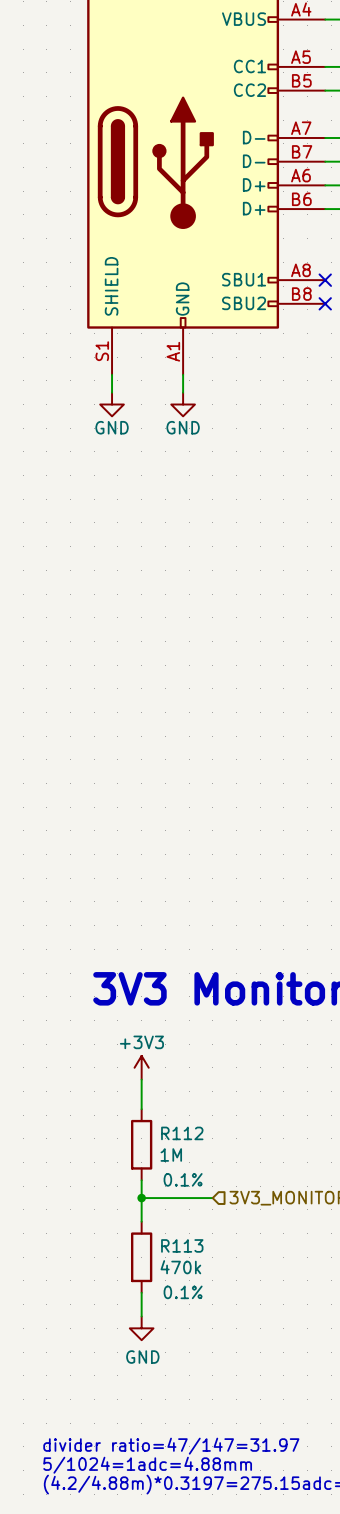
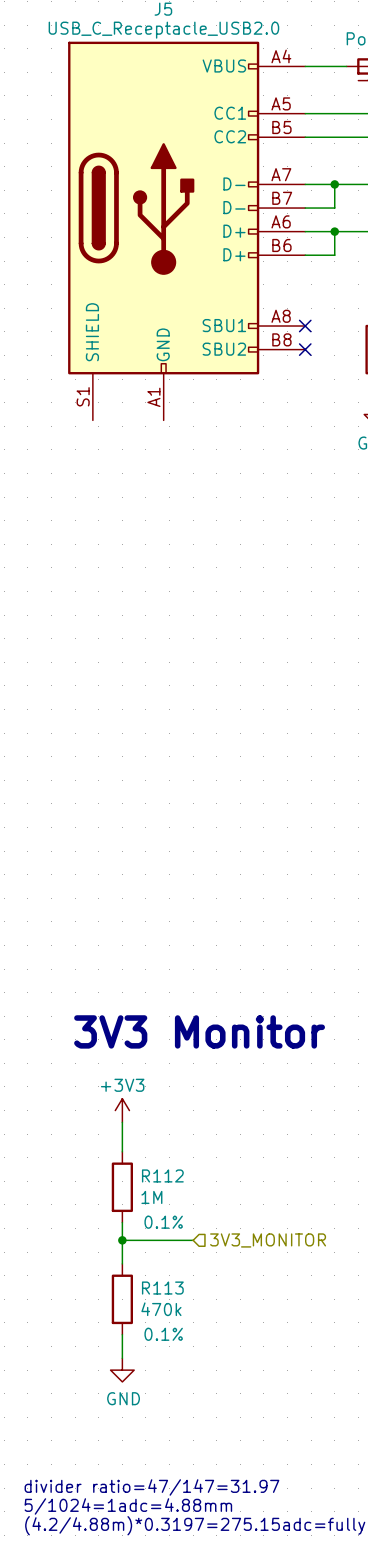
wire: (112, 374) (112, 392) -> none
wire: (183, 374) (183, 392) -> none
power symbol: GND (112, 404) -> none
power symbol: GND (183, 404) -> none

